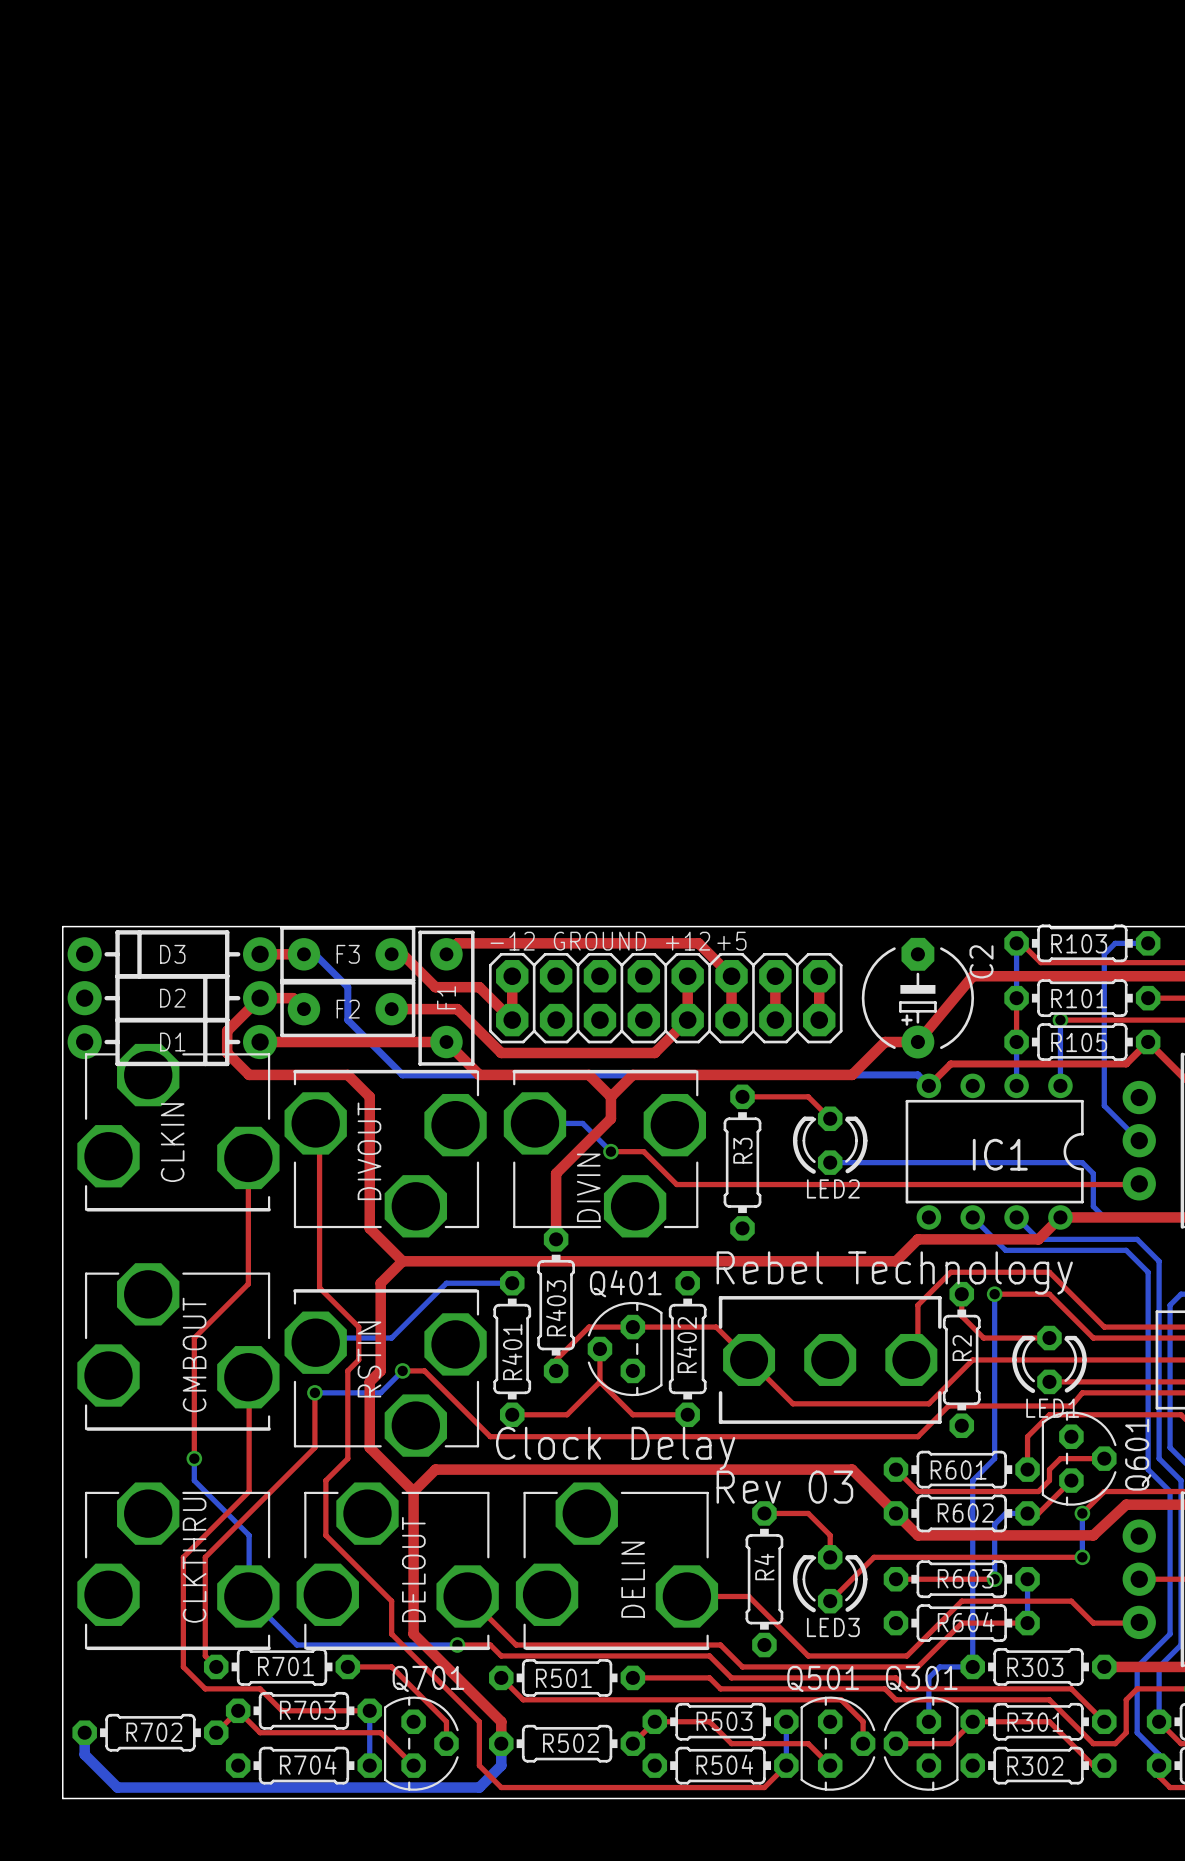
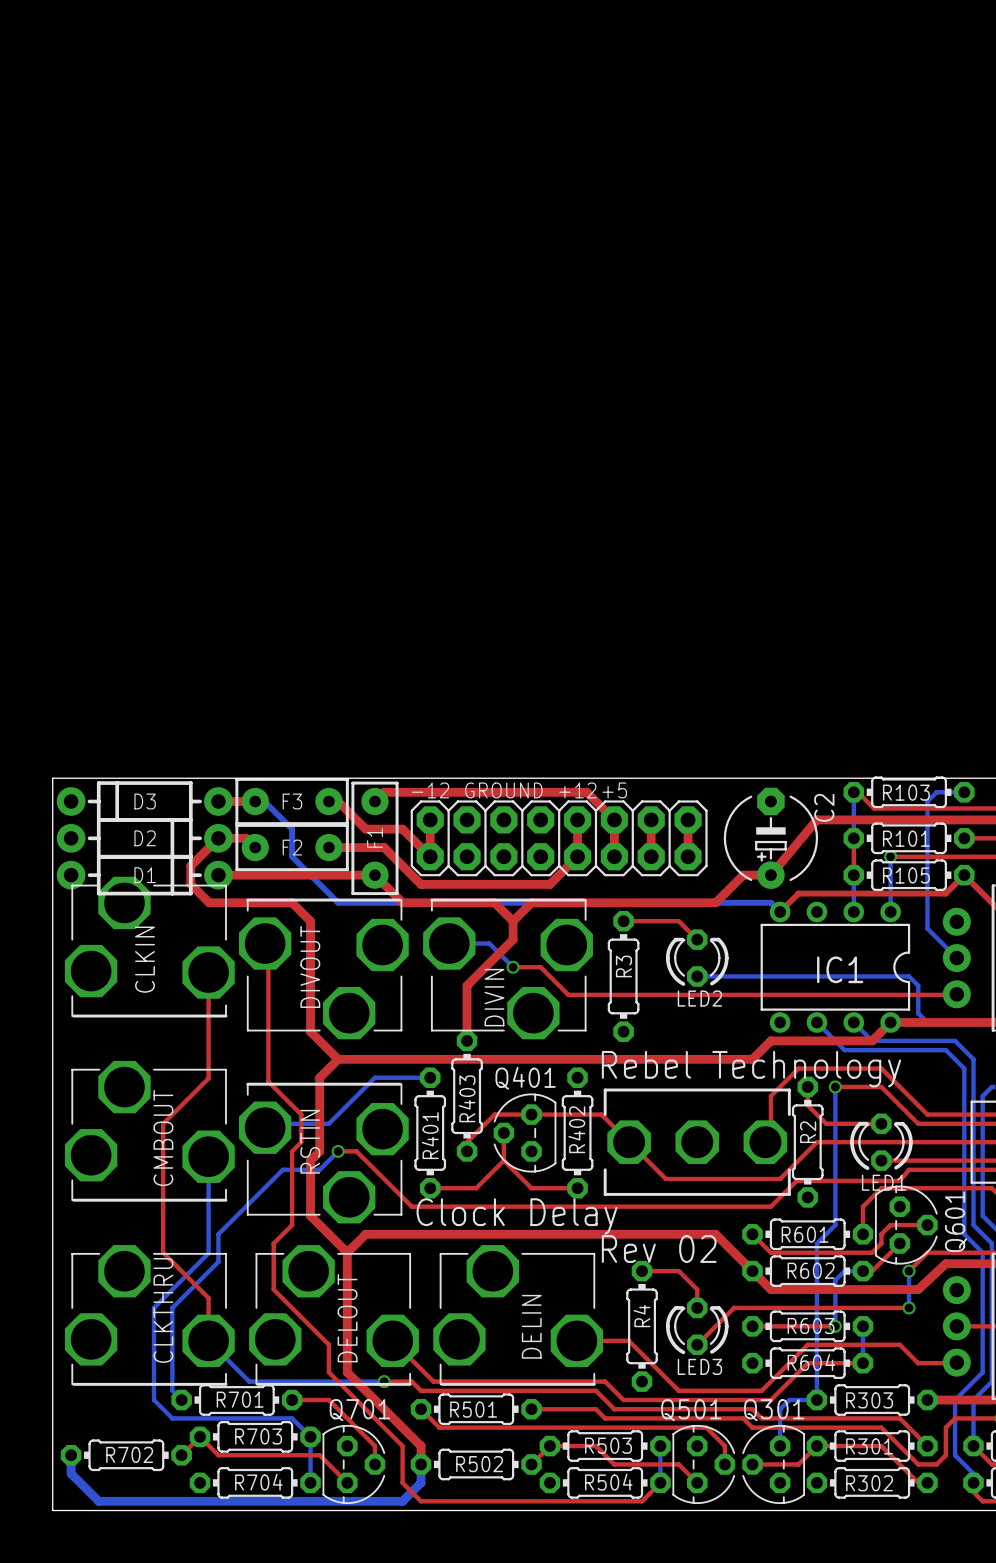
bottom track: none -> (208, 1156) (208, 1253) (153, 1307) (153, 1400) (172, 1418) (292, 1418) (310, 1436)
top track: (248, 1377) (249, 1491) (183, 1557) (183, 1666) (205, 1688) (260, 1688) (282, 1710) (369, 1710) -> none
bottom track: (314, 1392) (336, 1392) -> (181, 1400) (172, 1390) (172, 1307) (218, 1261) (218, 1234) (282, 1169)
top track: (314, 1392) (314, 1447) (205, 1557) (205, 1655) (216, 1666) -> none
via: (314, 1392) -> none
bottom track: (194, 1458) (194, 1480) (249, 1535) (248, 1596) -> none
top track: none -> (163, 1225) (163, 1252) (208, 1298) (208, 1340)
via: (194, 1458) -> none
text: Rev 03 (784, 1487) -> Rev 02 (659, 1249)

